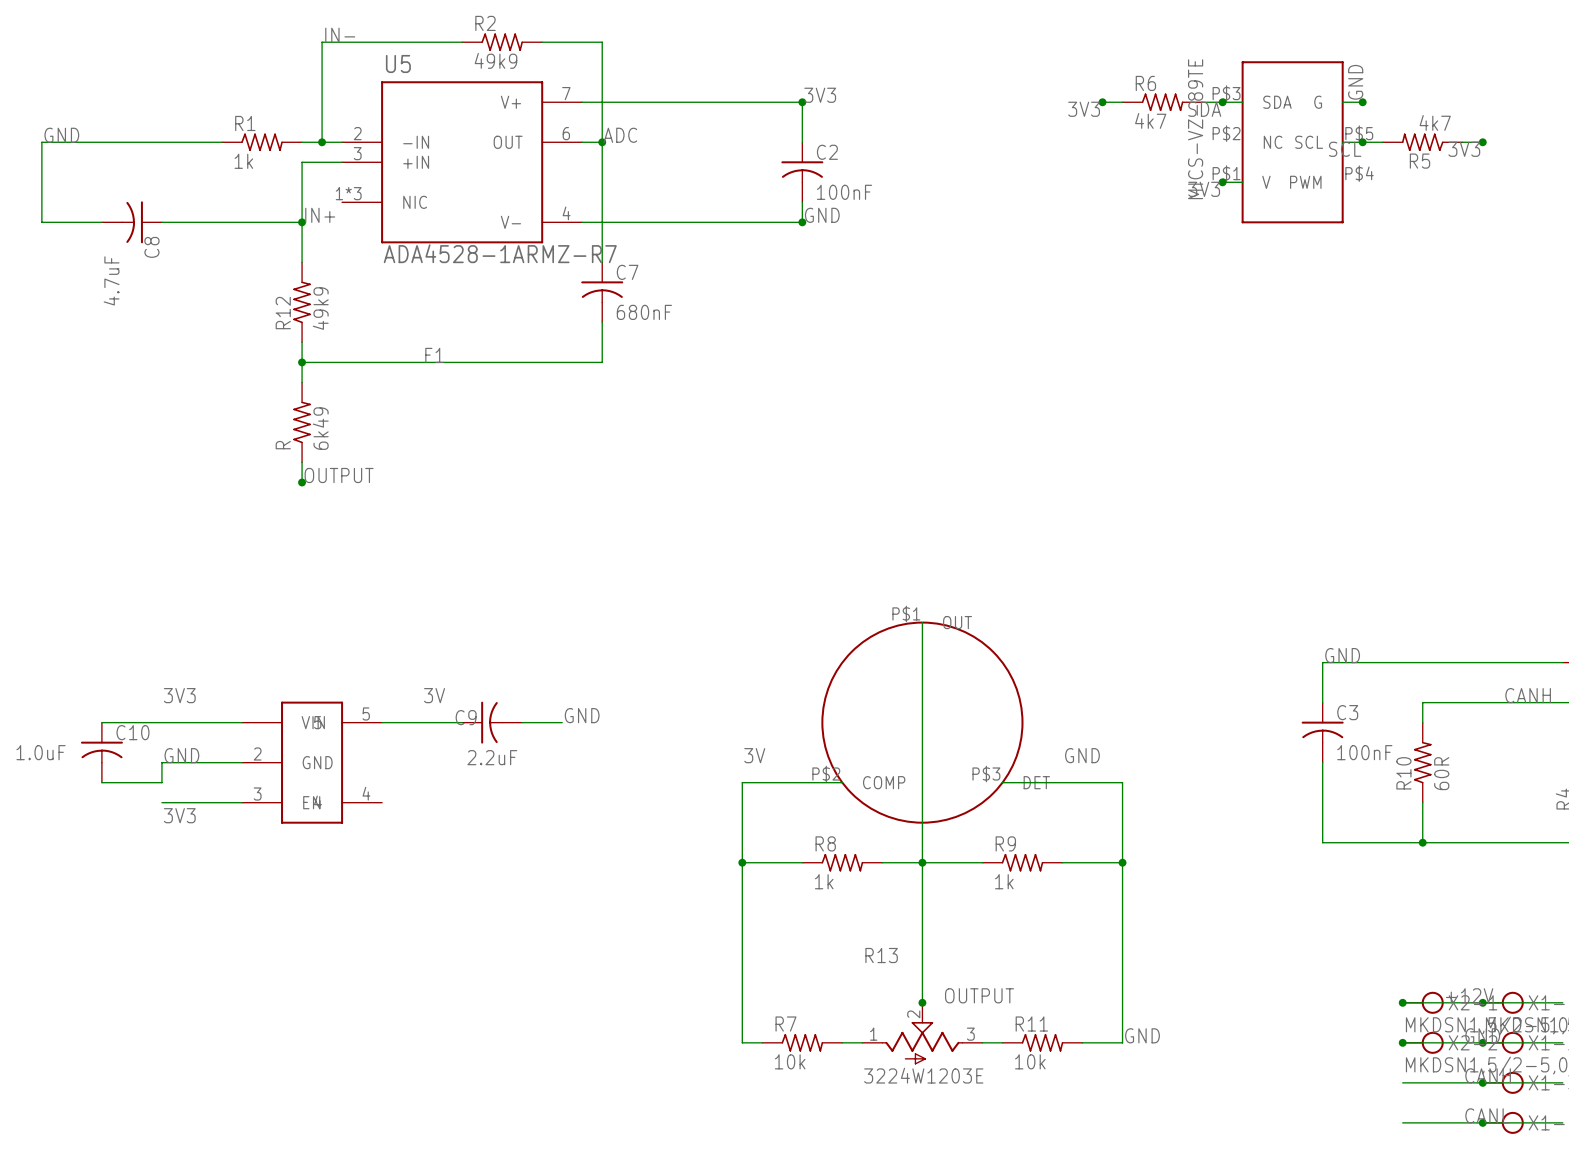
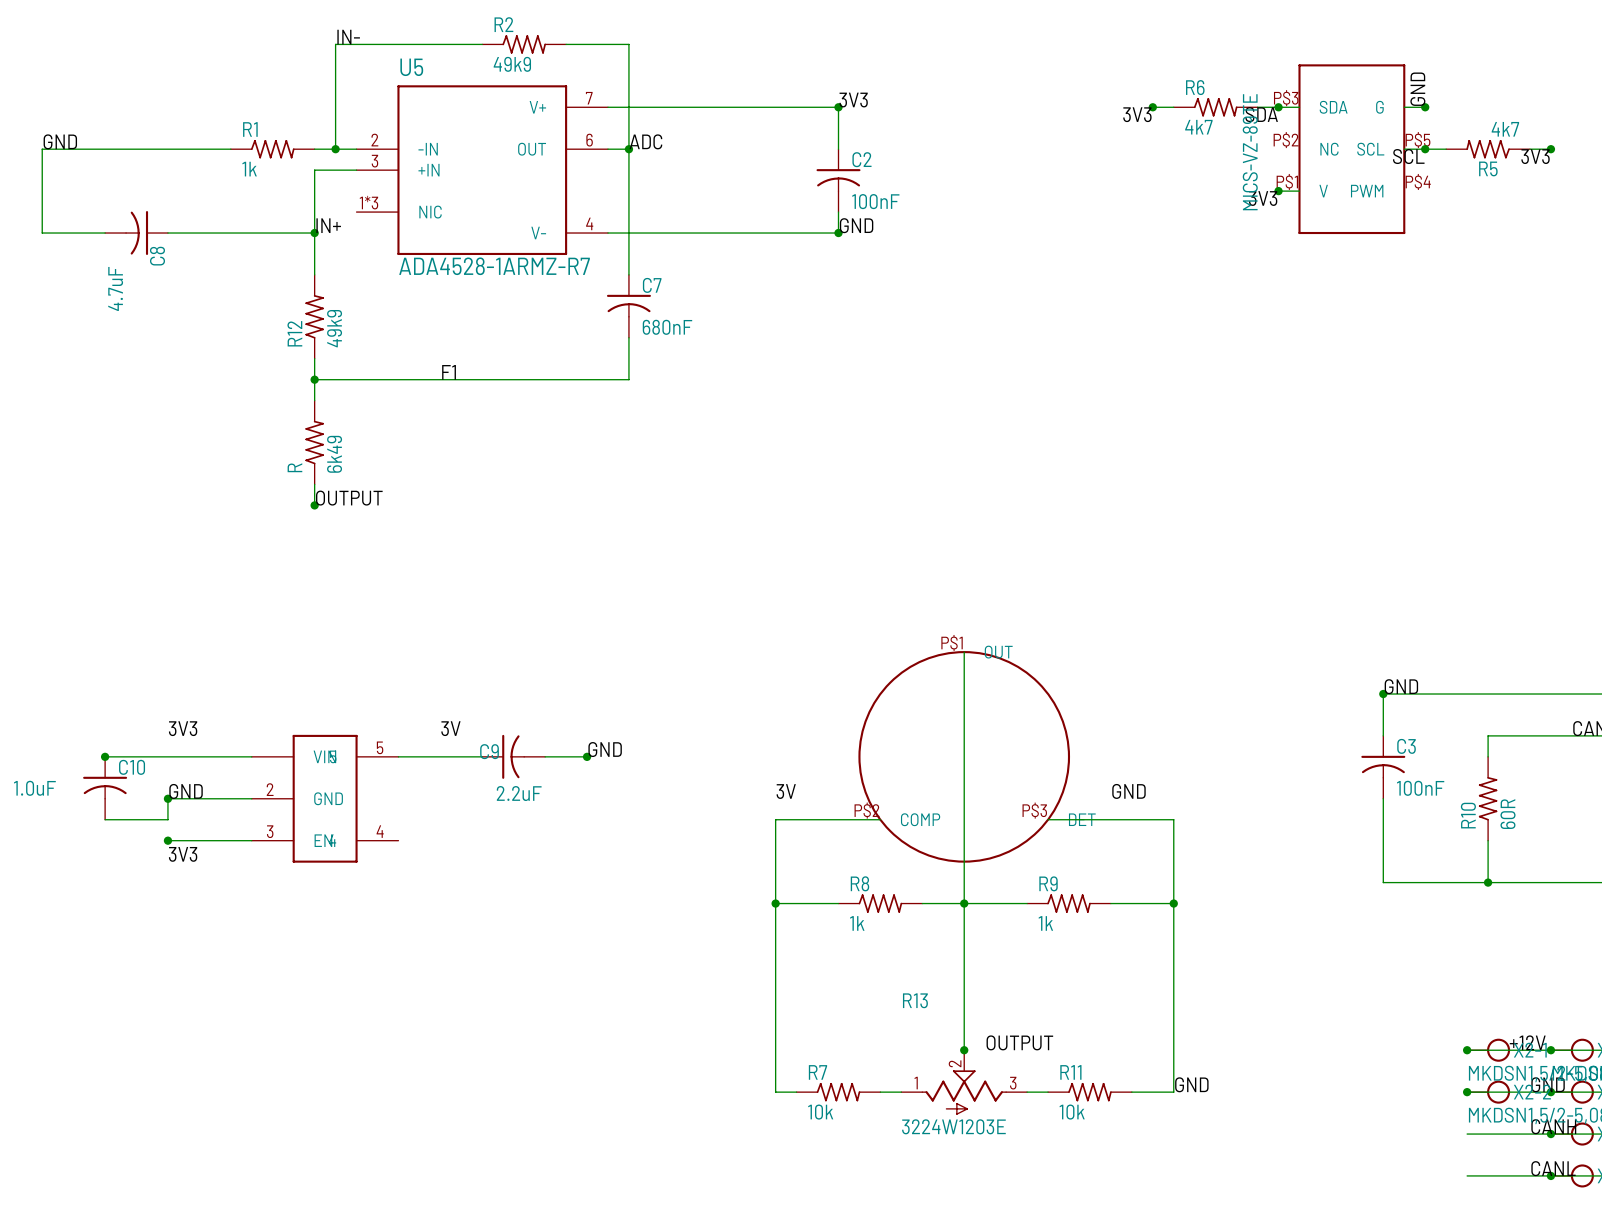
junction: none -> (1383, 694)
junction: none -> (105, 756)
junction: none -> (587, 756)
junction: none -> (167, 798)
junction: none -> (167, 840)

